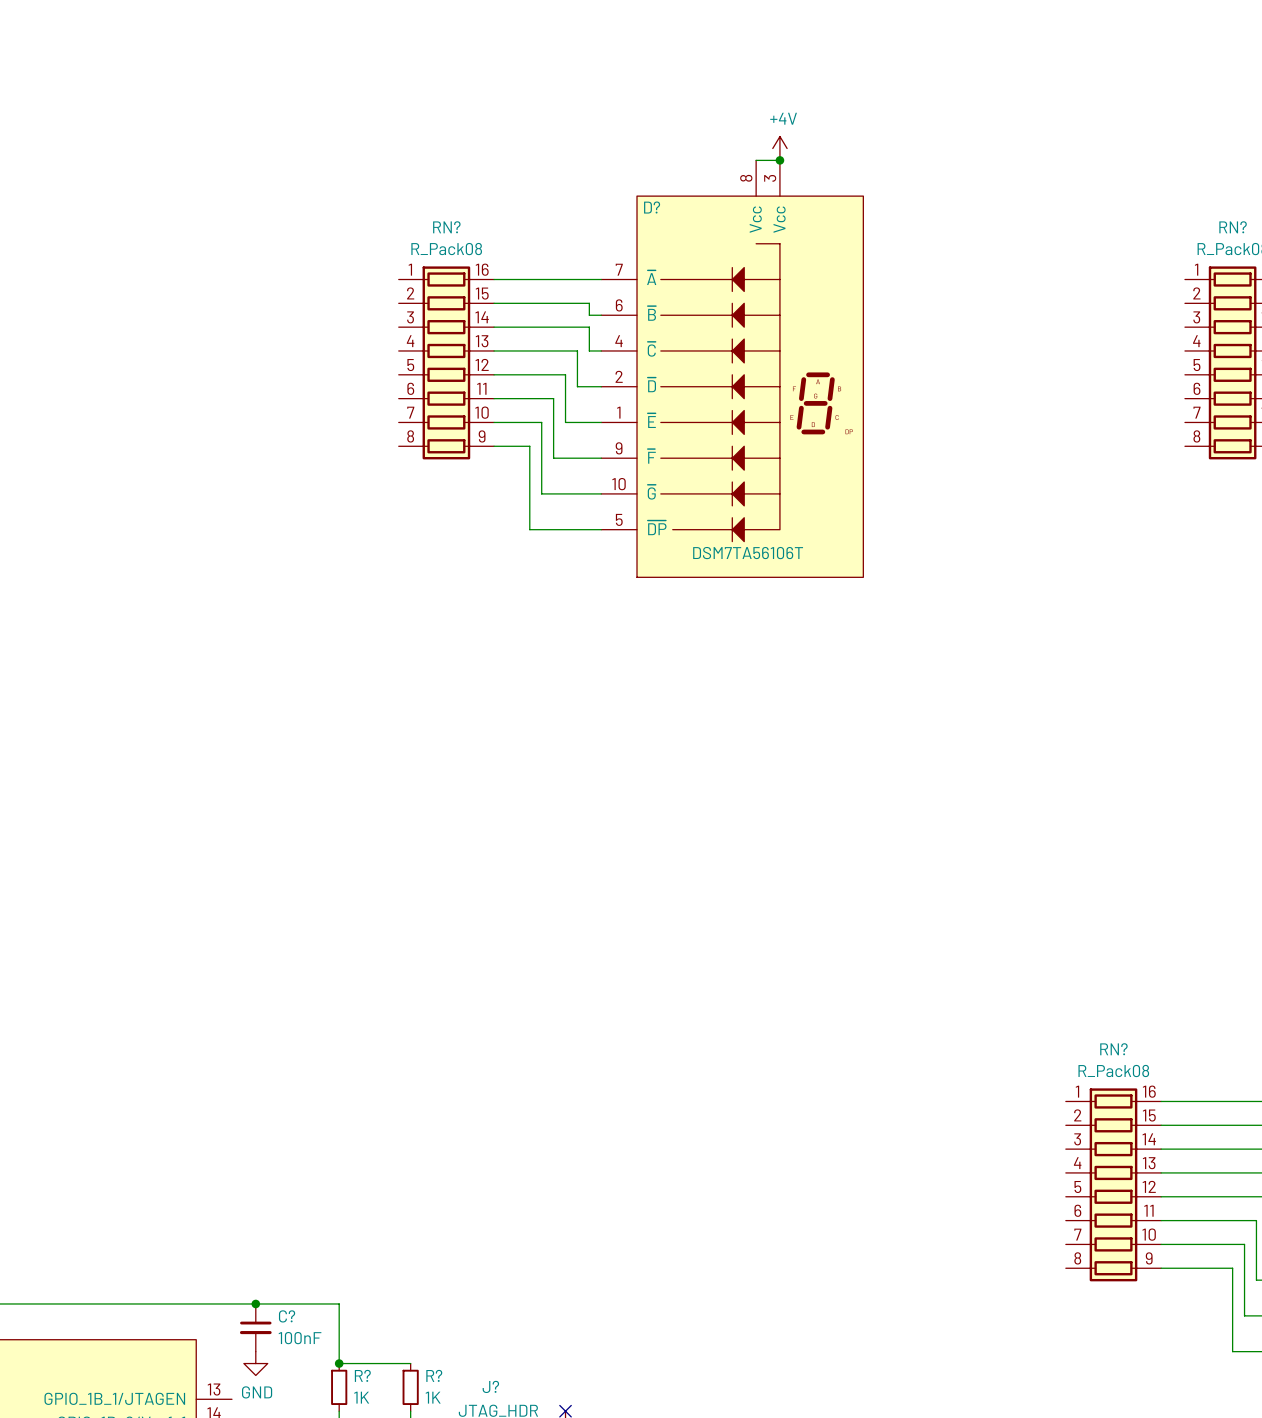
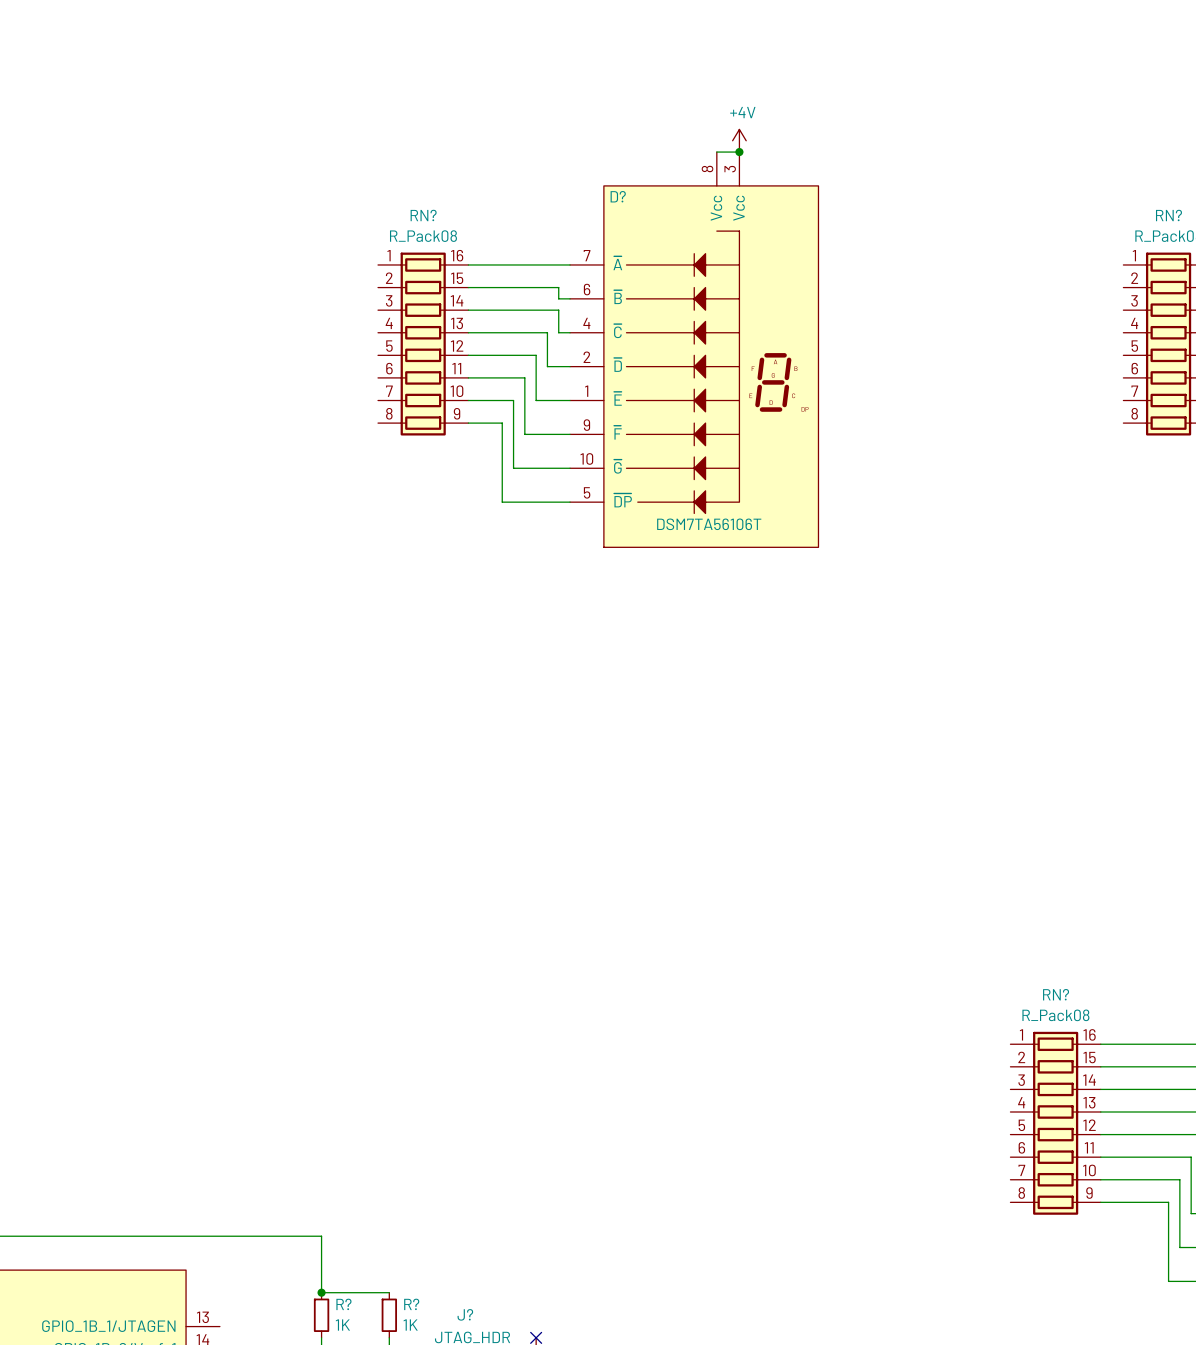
junction: (255, 1303) -> none
C?: 100nF (255, 1327) -> none
power symbol: GND (255, 1363) -> none

